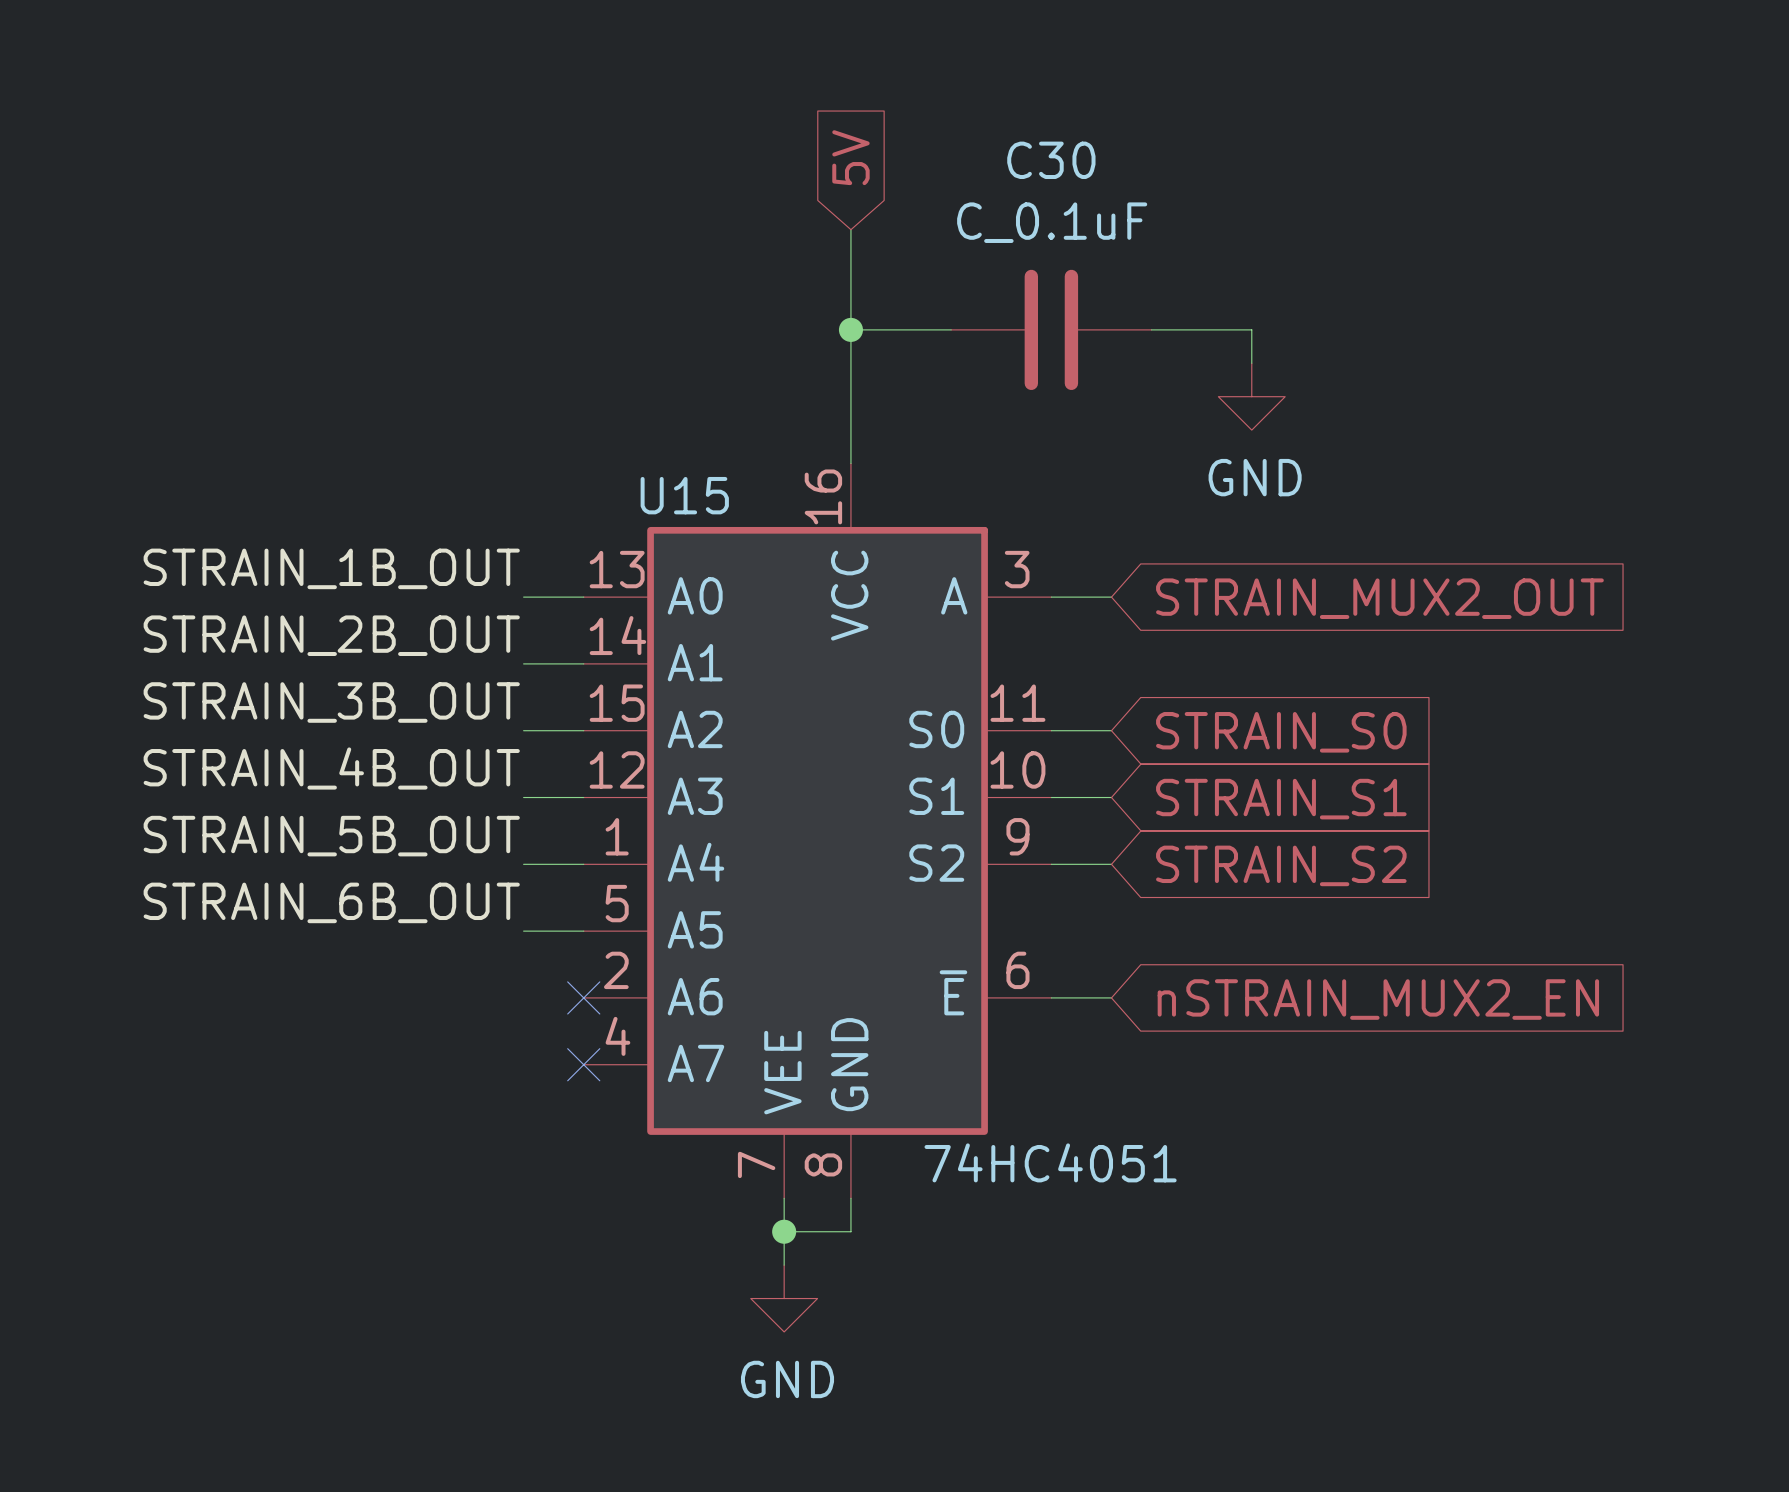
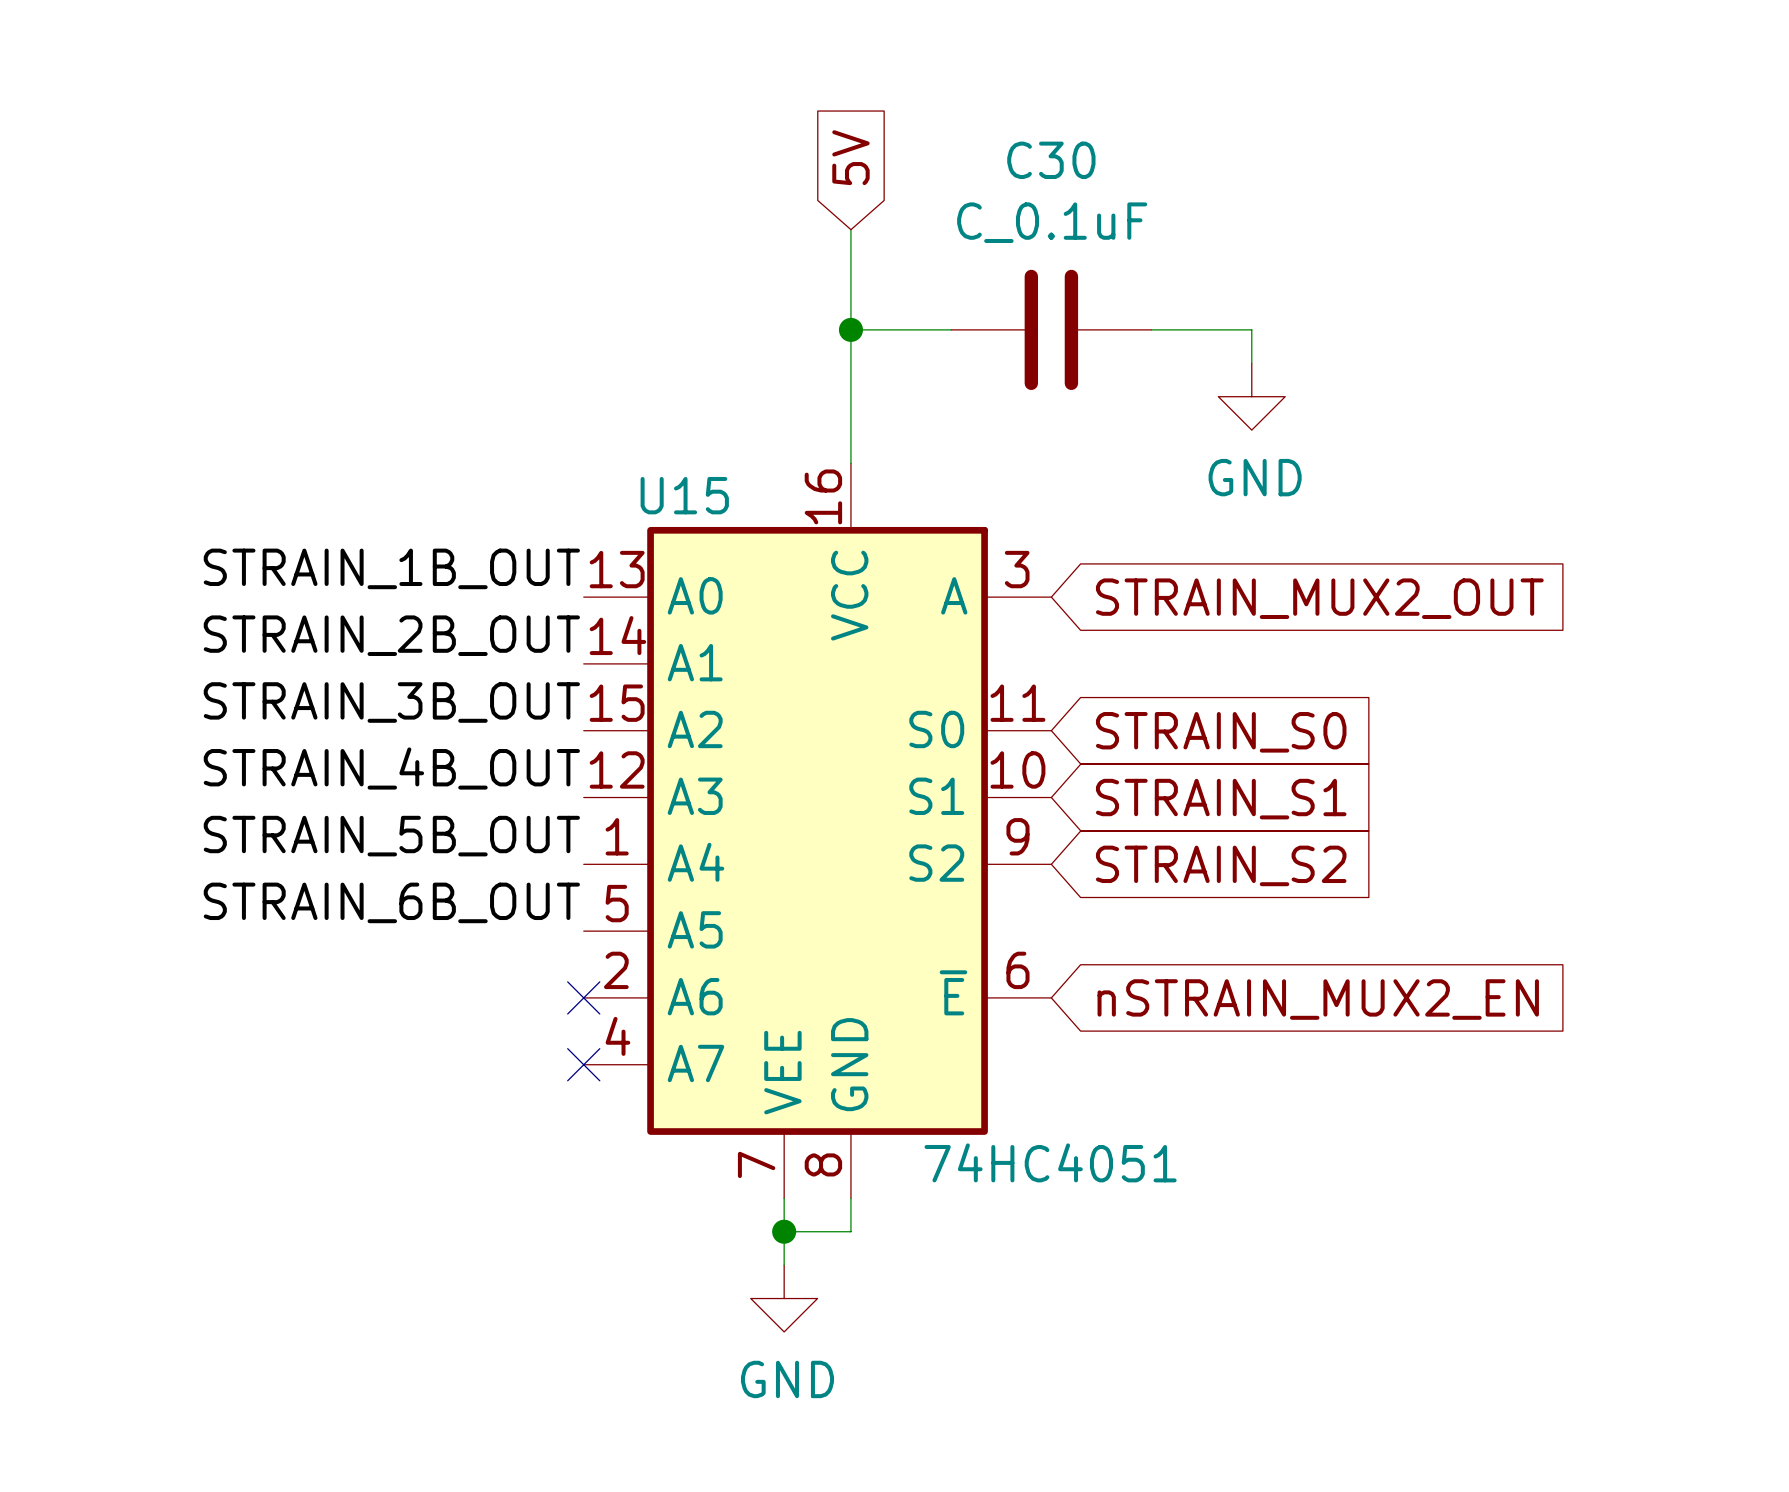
label position: STRAIN_1B_OUT (331, 568) -> STRAIN_1B_OUT (391, 568)
wire: (523, 597) (583, 597) -> none
wire: (1051, 597) (1111, 597) -> none
global label position: STRAIN_MUX2_OUT (1379, 598) -> STRAIN_MUX2_OUT (1319, 598)
label position: STRAIN_2B_OUT (331, 635) -> STRAIN_2B_OUT (391, 635)
wire: (523, 663) (583, 663) -> none
label position: STRAIN_3B_OUT (331, 702) -> STRAIN_3B_OUT (391, 702)
wire: (523, 730) (583, 730) -> none
wire: (1051, 730) (1111, 730) -> none
global label position: STRAIN_S0 (1281, 732) -> STRAIN_S0 (1221, 732)
label position: STRAIN_4B_OUT (331, 768) -> STRAIN_4B_OUT (391, 768)
wire: (523, 797) (583, 797) -> none
wire: (1051, 797) (1111, 797) -> none
global label position: STRAIN_S1 (1281, 799) -> STRAIN_S1 (1221, 799)
label position: STRAIN_5B_OUT (331, 836) -> STRAIN_5B_OUT (391, 836)
wire: (523, 864) (583, 864) -> none
wire: (1051, 864) (1111, 864) -> none
global label position: STRAIN_S2 (1281, 865) -> STRAIN_S2 (1221, 865)
label position: STRAIN_6B_OUT (331, 902) -> STRAIN_6B_OUT (391, 902)
wire: (523, 931) (583, 931) -> none
wire: (1051, 997) (1111, 997) -> none
global label position: nSTRAIN_MUX2_EN (1378, 999) -> nSTRAIN_MUX2_EN (1318, 999)

